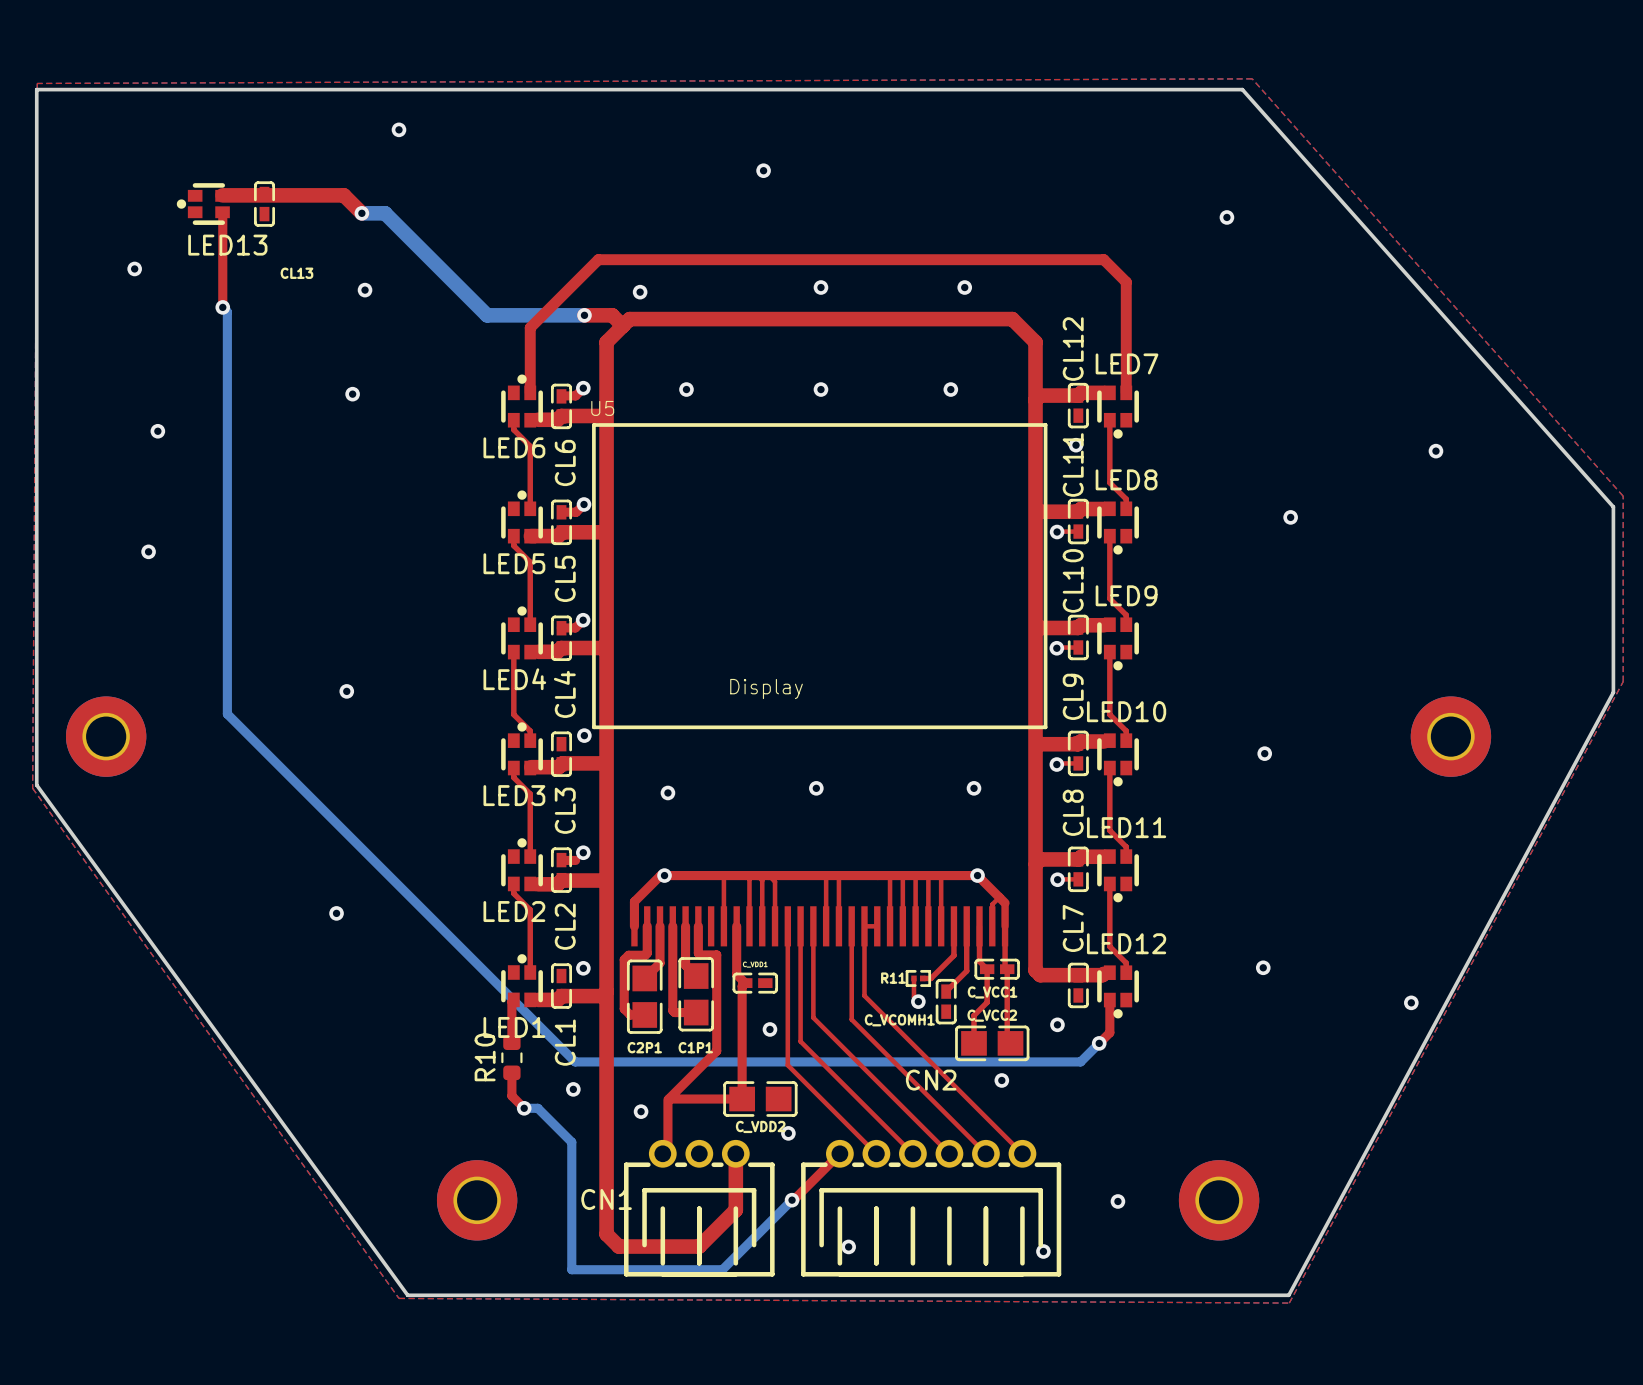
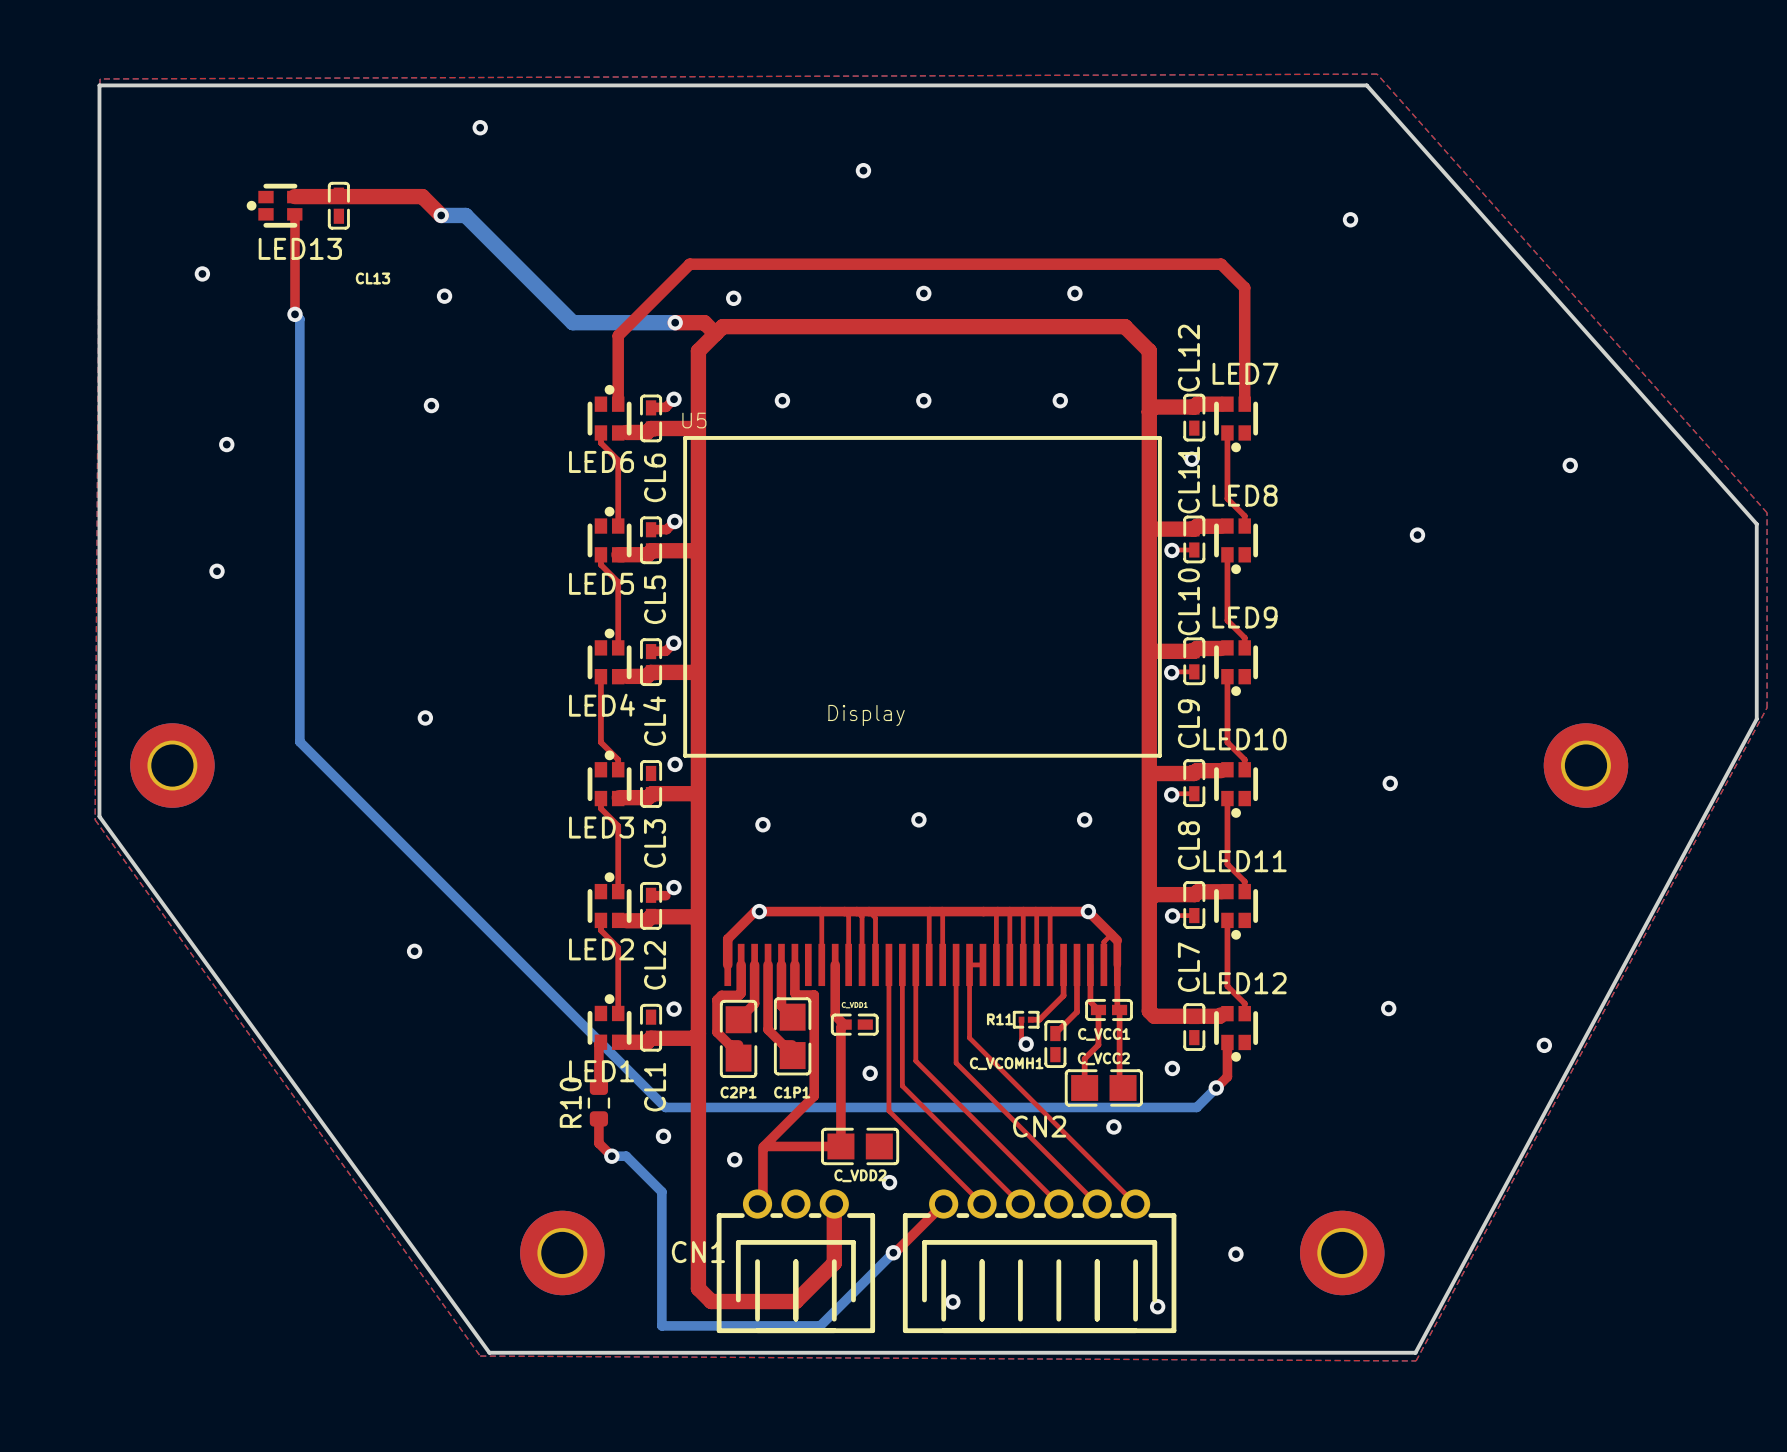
top track: (672, 987) (672, 1010) (674, 1012) (696, 1012) -> (768, 1029) (783, 1044) (792, 1044)
top track: (624, 990) (624, 1008) (630, 1014) (644, 1014) -> (716, 1032) (729, 1044) (738, 1044)

